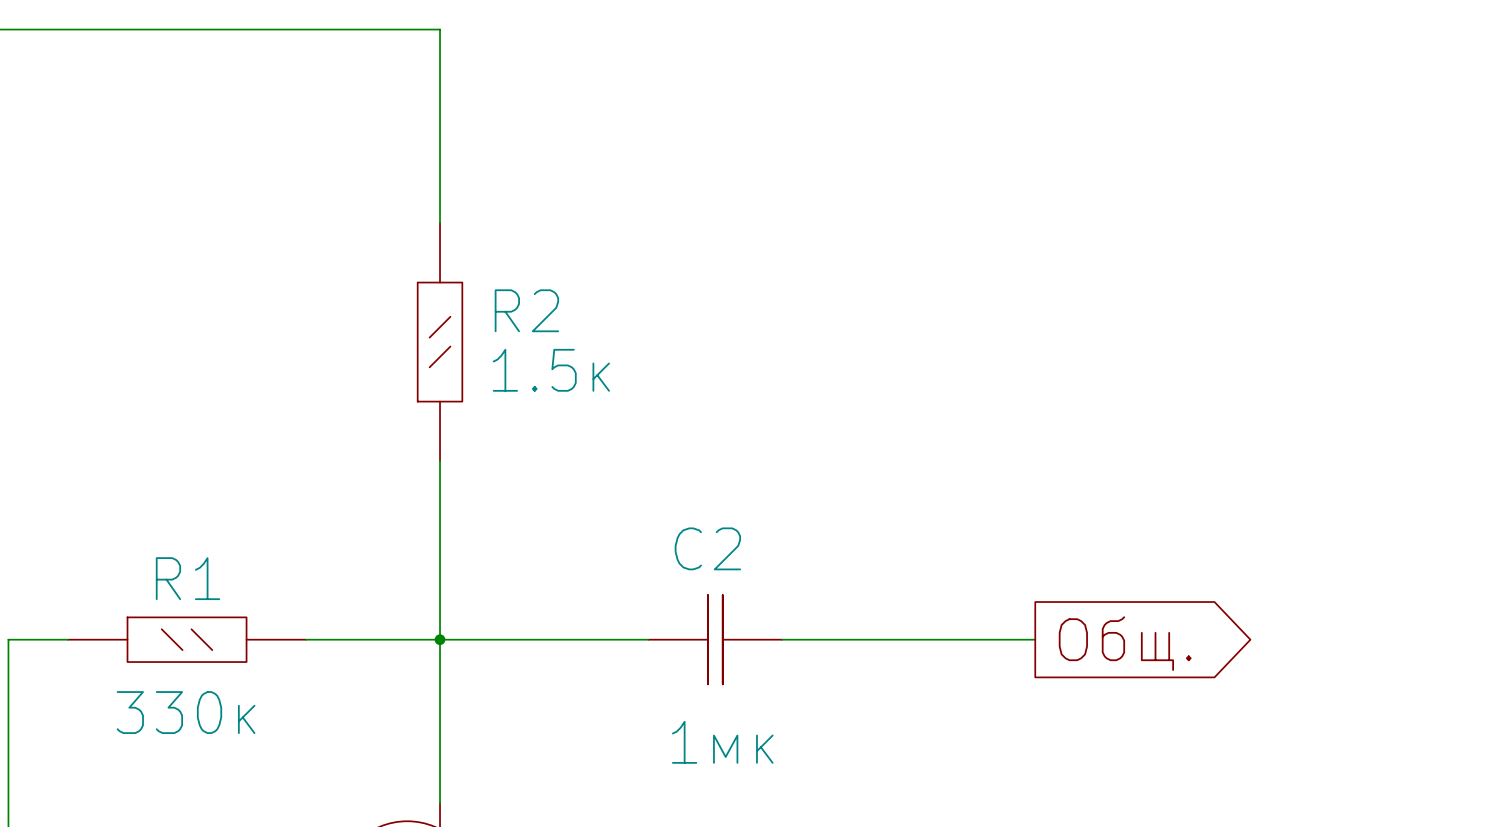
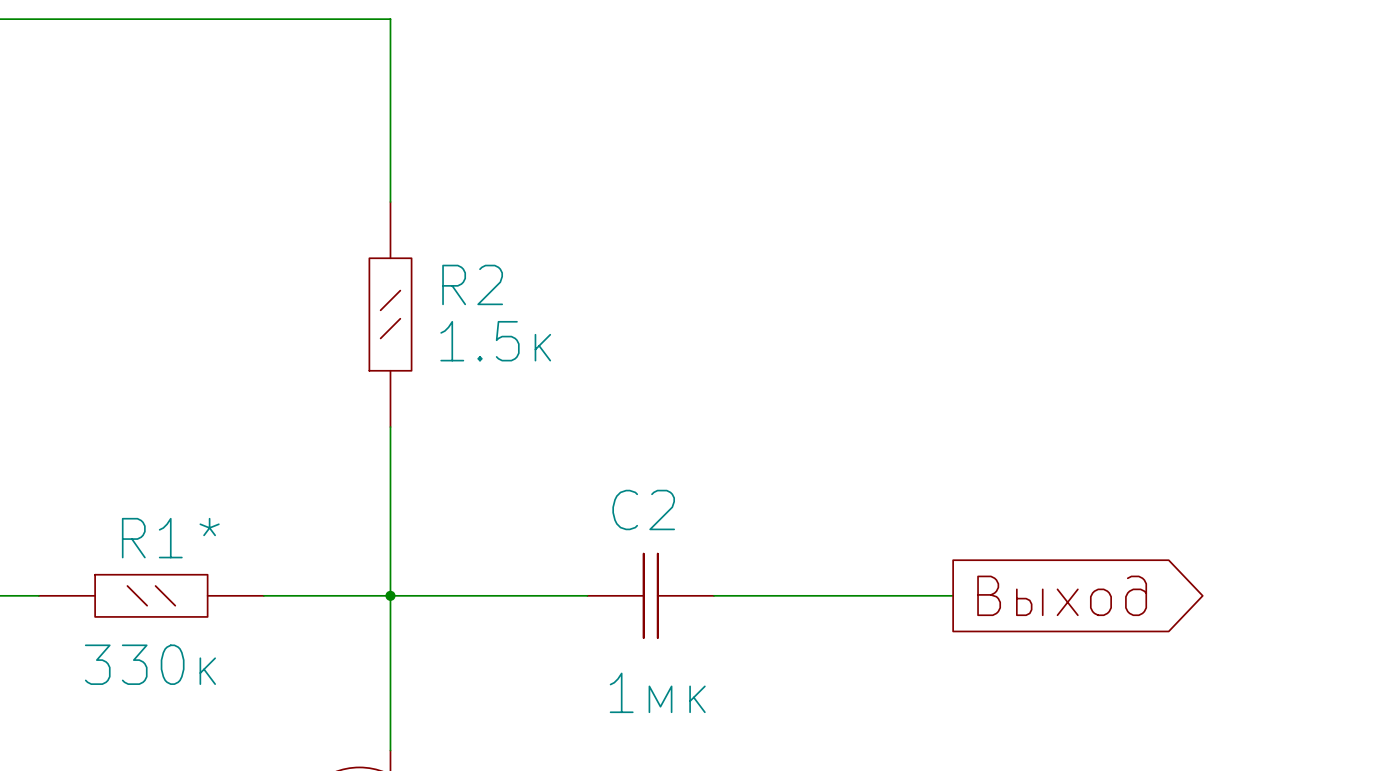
R1 text: none -> * (209, 527)
global label: Общ. (1125, 643) -> Выход (1062, 595)

